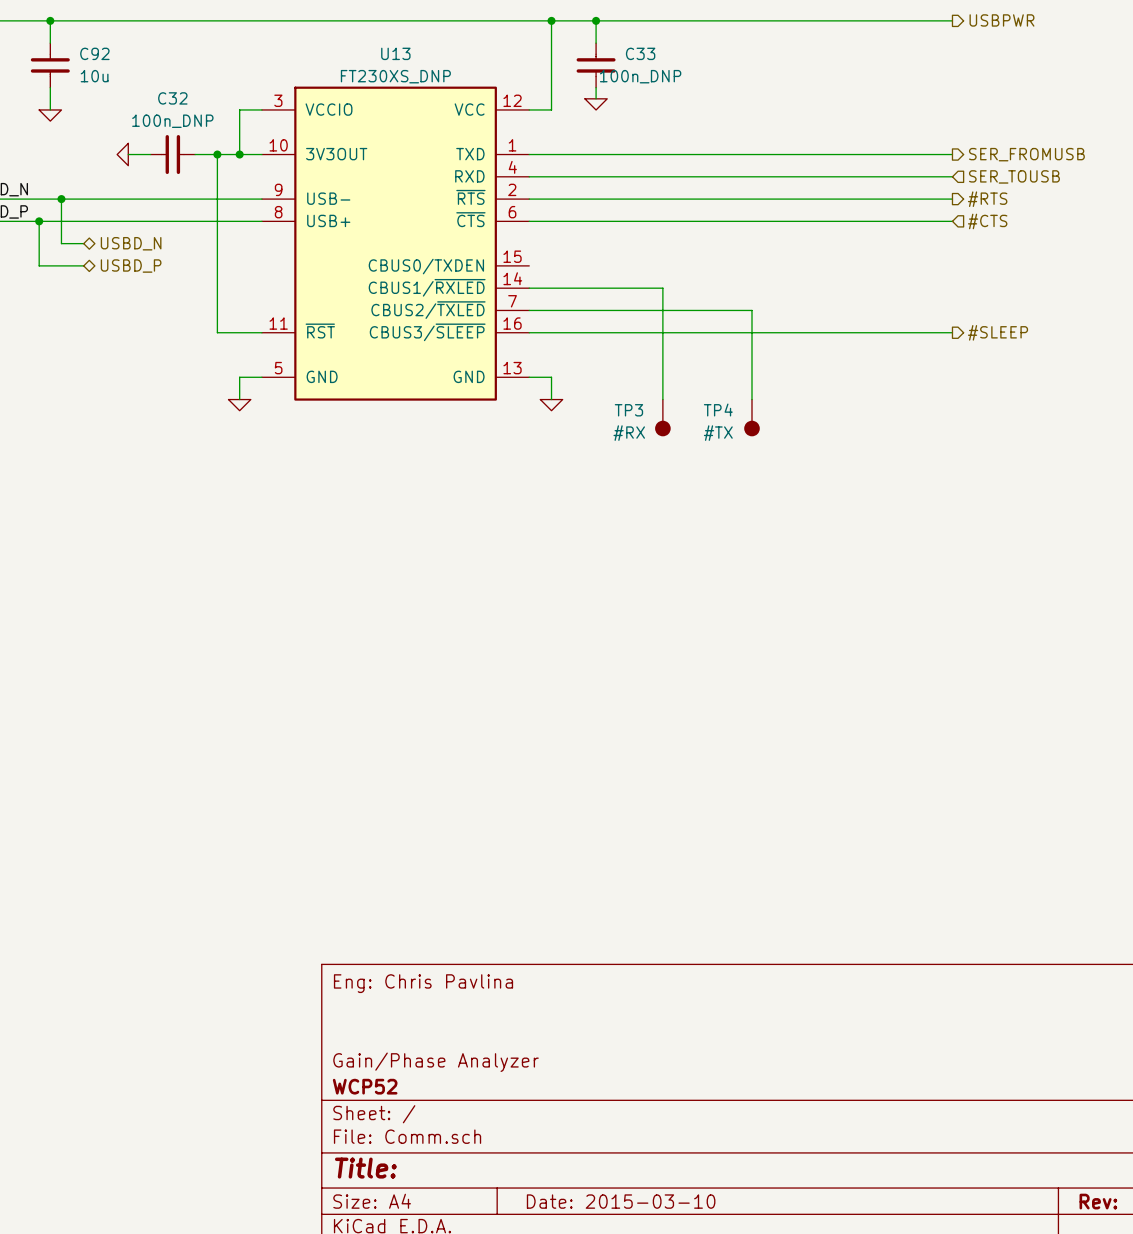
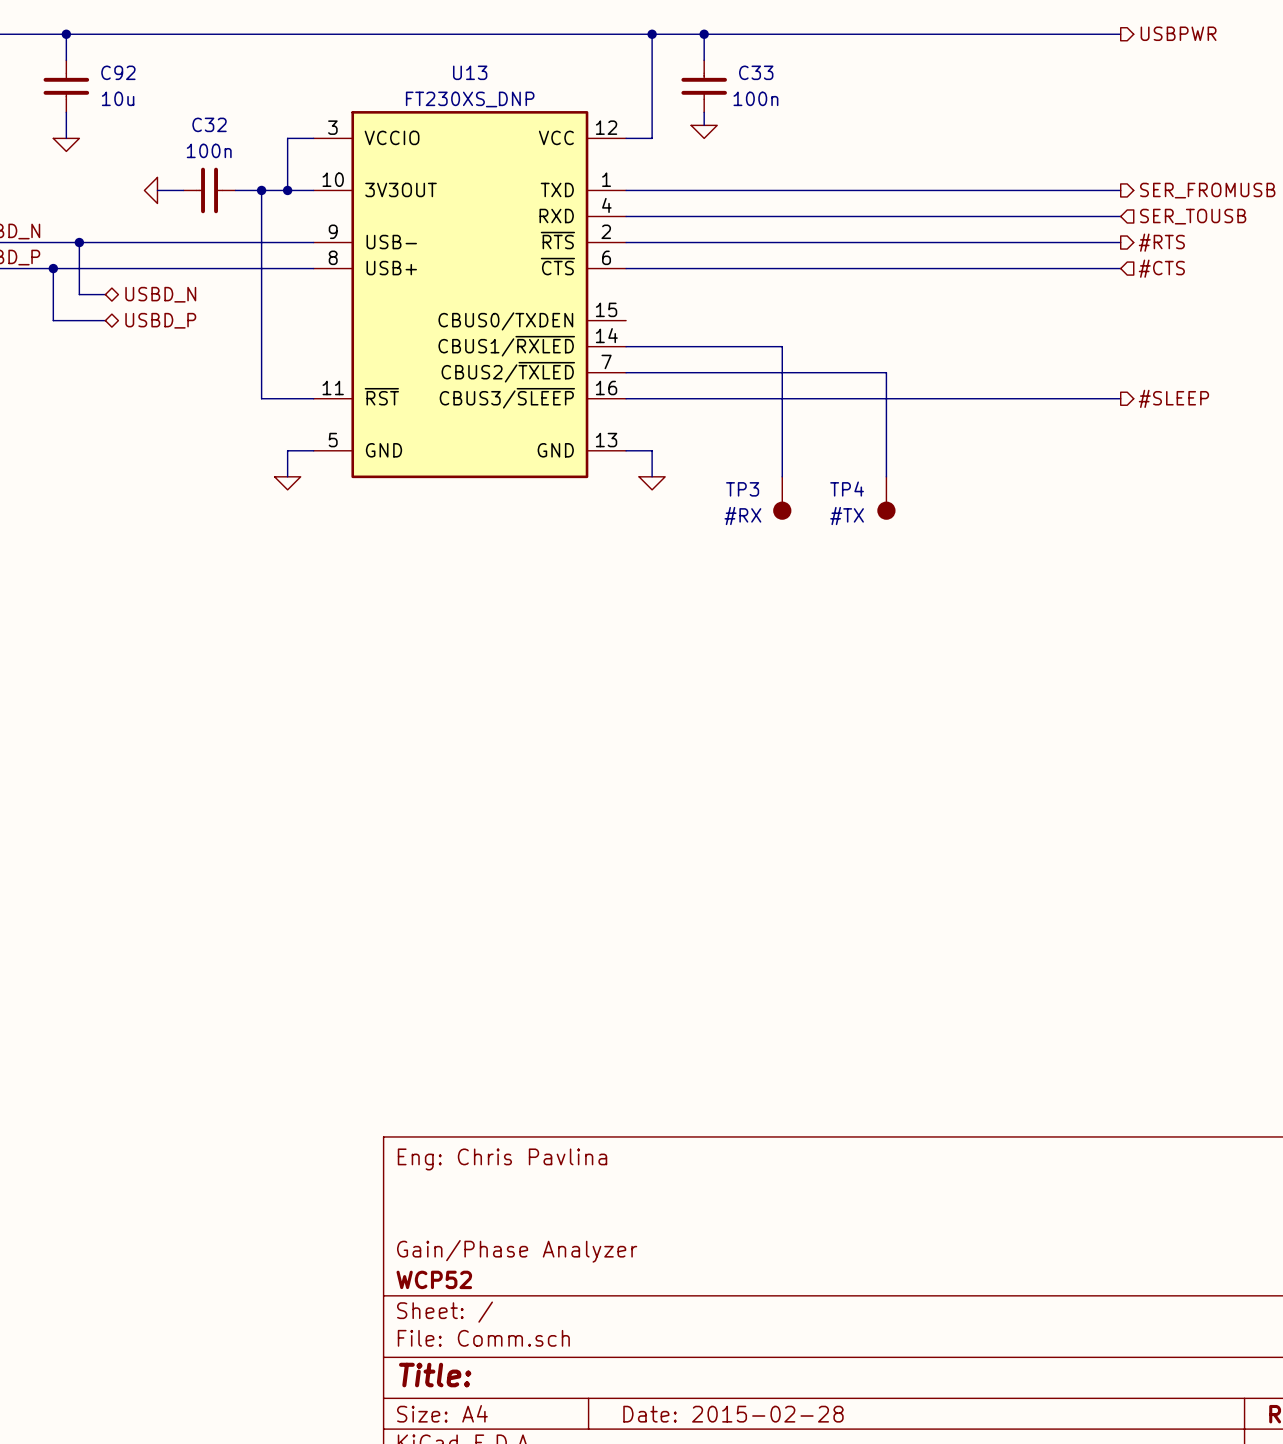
C33 value: 100n_DNP (640, 76) -> 100n (755, 98)
C32 value: 100n_DNP (172, 121) -> 100n (209, 150)
title block: Date: 2015-03-10 (621, 1201) -> Date: 2015-02-28 (733, 1414)

